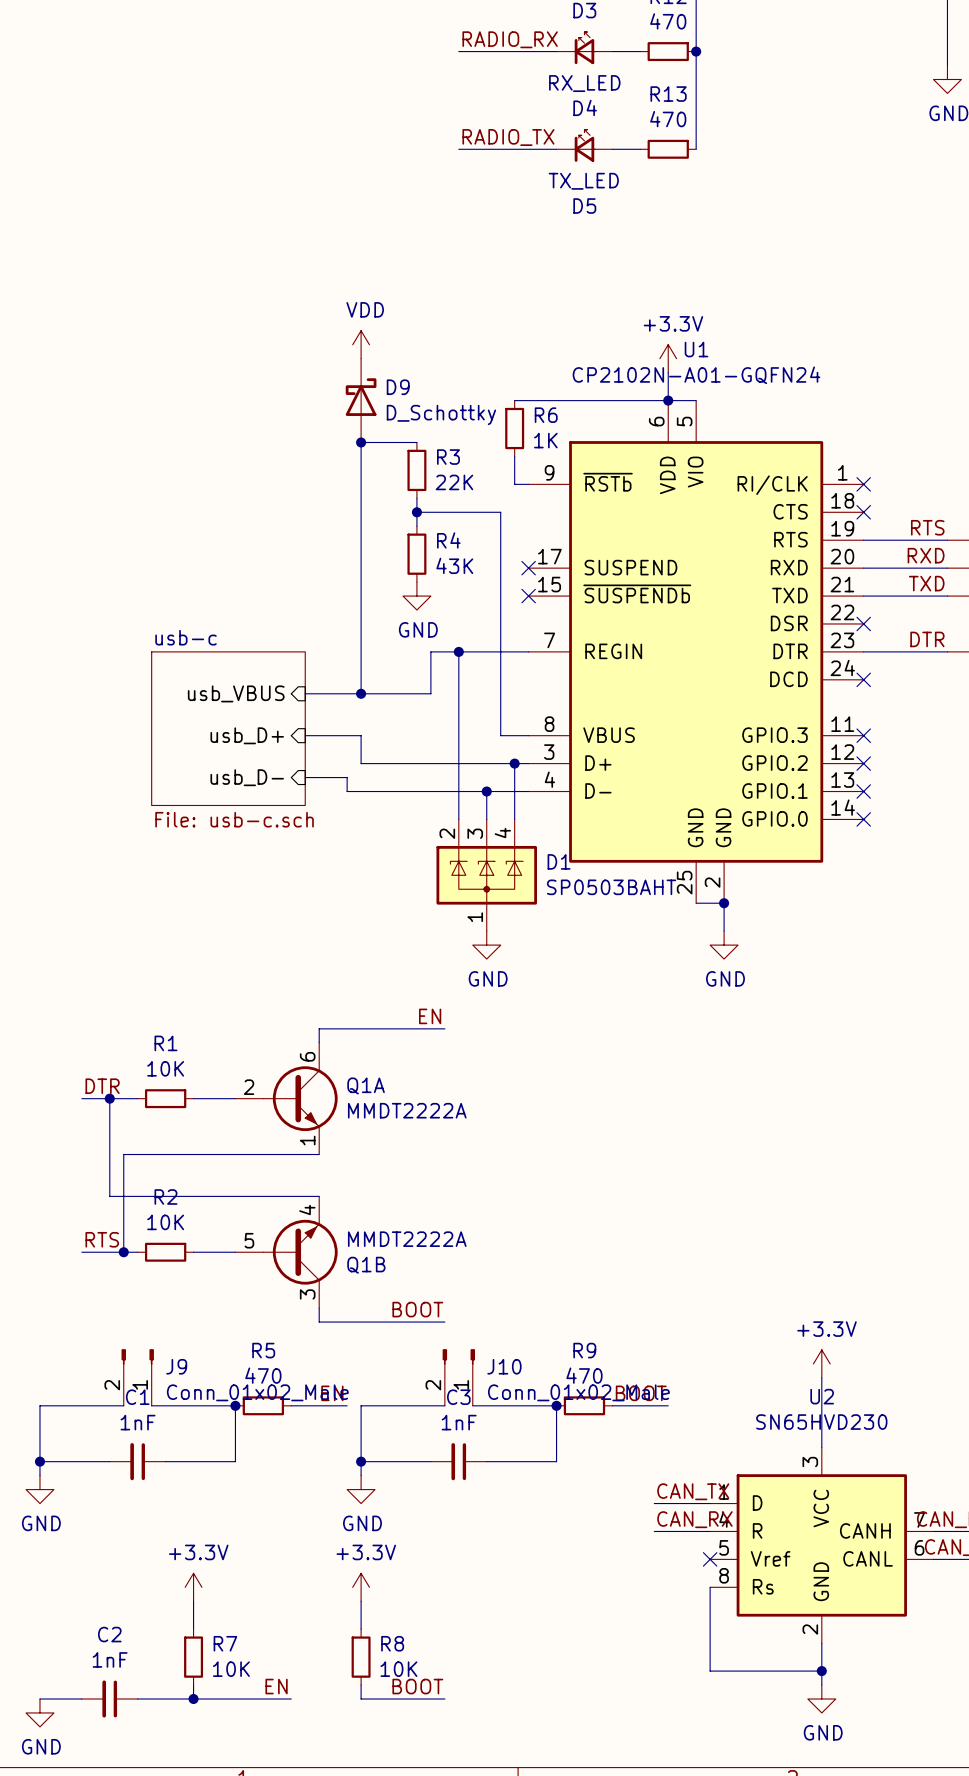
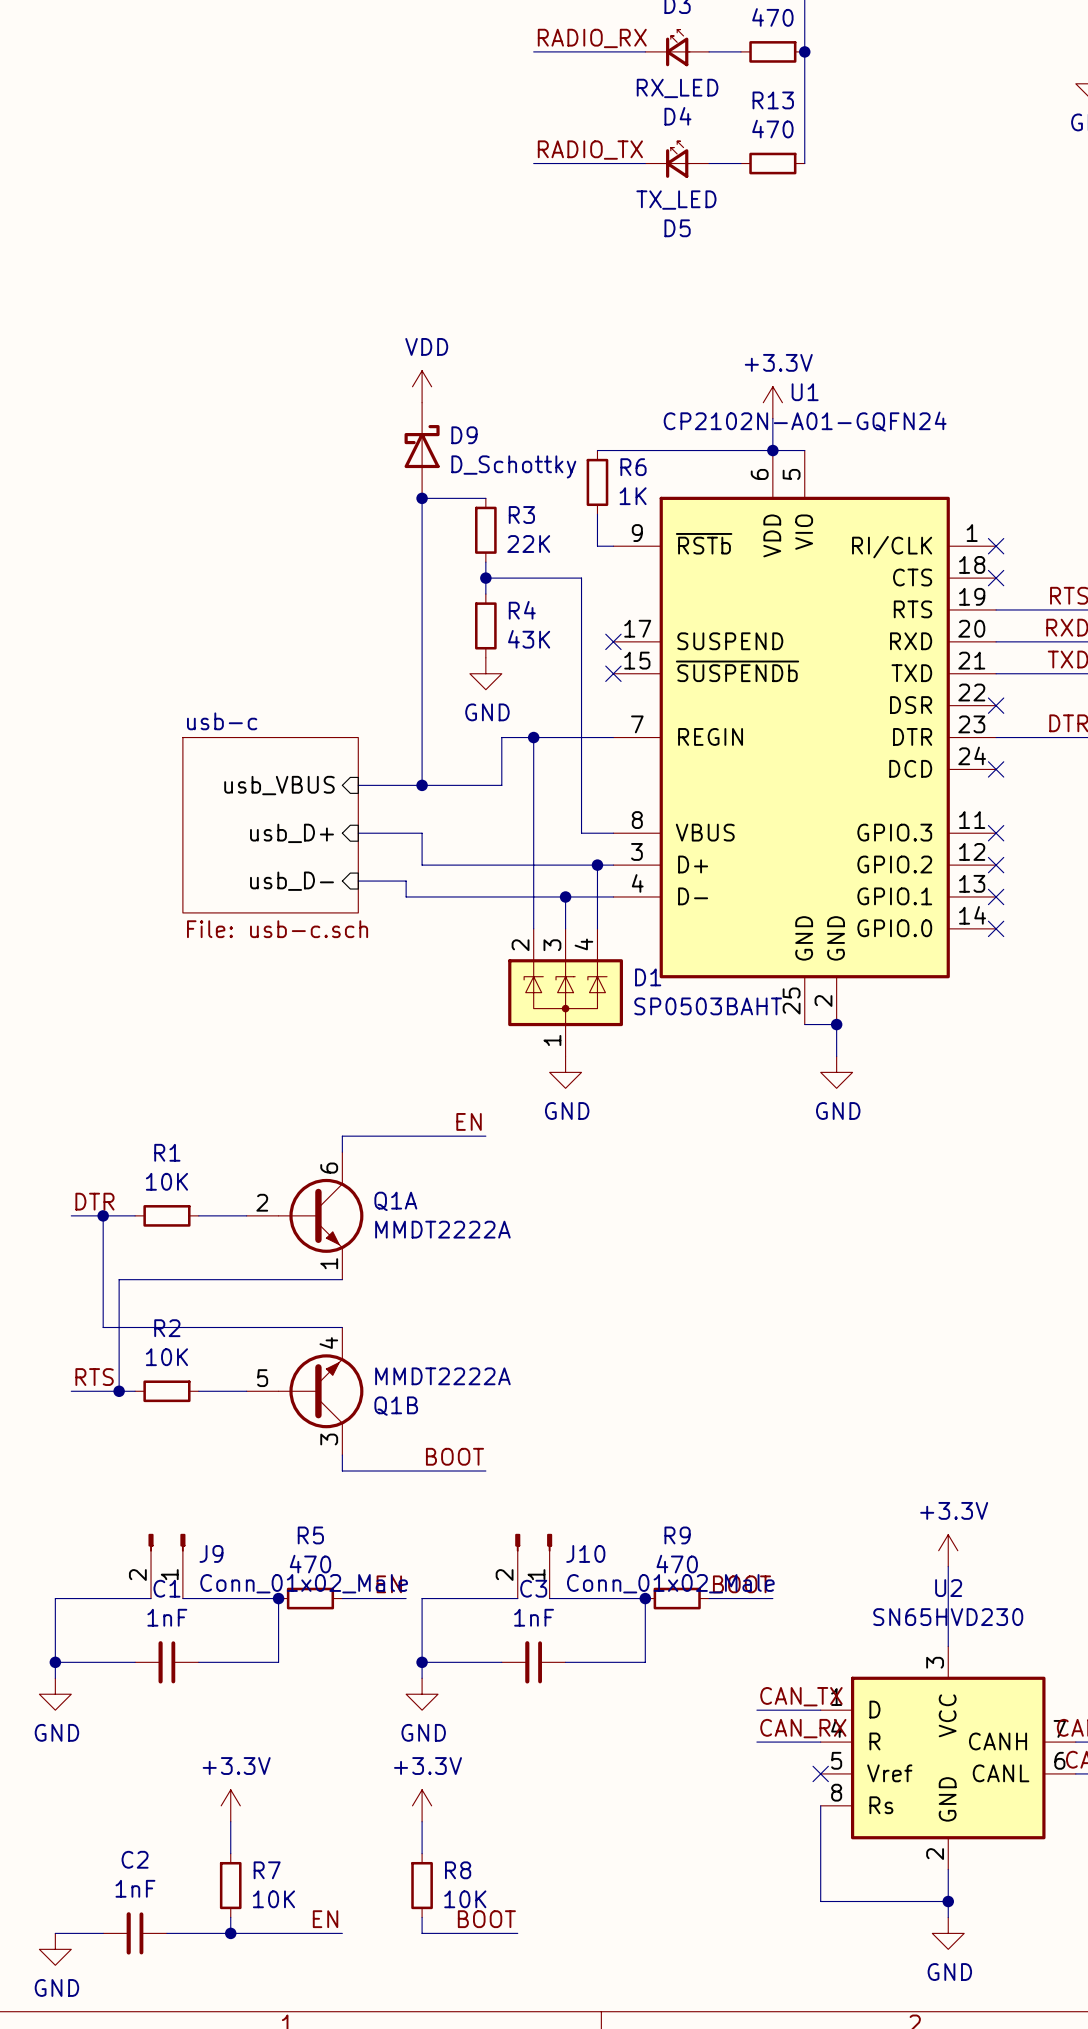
label position: EN (430, 1016) -> EN (469, 1121)
wire: (444, 1028) (319, 1028) (319, 1042) -> (485, 1136) (342, 1136) (342, 1152)
label position: DTR (102, 1086) -> DTR (94, 1201)
wire: (81, 1098) (137, 1098) -> (71, 1215) (135, 1215)
wire: (109, 1098) (109, 1196) (319, 1196) -> (103, 1215) (103, 1327) (342, 1327)
junction position: (109, 1098) -> (103, 1215)
R1 position: (165, 1098) -> (166, 1215)
wire: (193, 1098) (235, 1098) -> (198, 1215) (246, 1215)
Q1A position: (286, 1098) -> (305, 1215)
wire: (319, 1154) (123, 1154) (123, 1252) -> (342, 1279) (119, 1279) (119, 1391)
label position: RTS (102, 1239) -> RTS (94, 1377)
wire: (81, 1252) (137, 1252) -> (71, 1391) (135, 1391)
junction position: (123, 1252) -> (119, 1391)
R2 position: (165, 1252) -> (166, 1391)
wire: (193, 1252) (235, 1252) -> (198, 1391) (246, 1391)
Q1B position: (286, 1252) -> (305, 1391)
wire: (319, 1308) (319, 1322) (444, 1322) -> (342, 1455) (342, 1471) (485, 1471)
label position: BOOT (417, 1309) -> BOOT (454, 1456)

